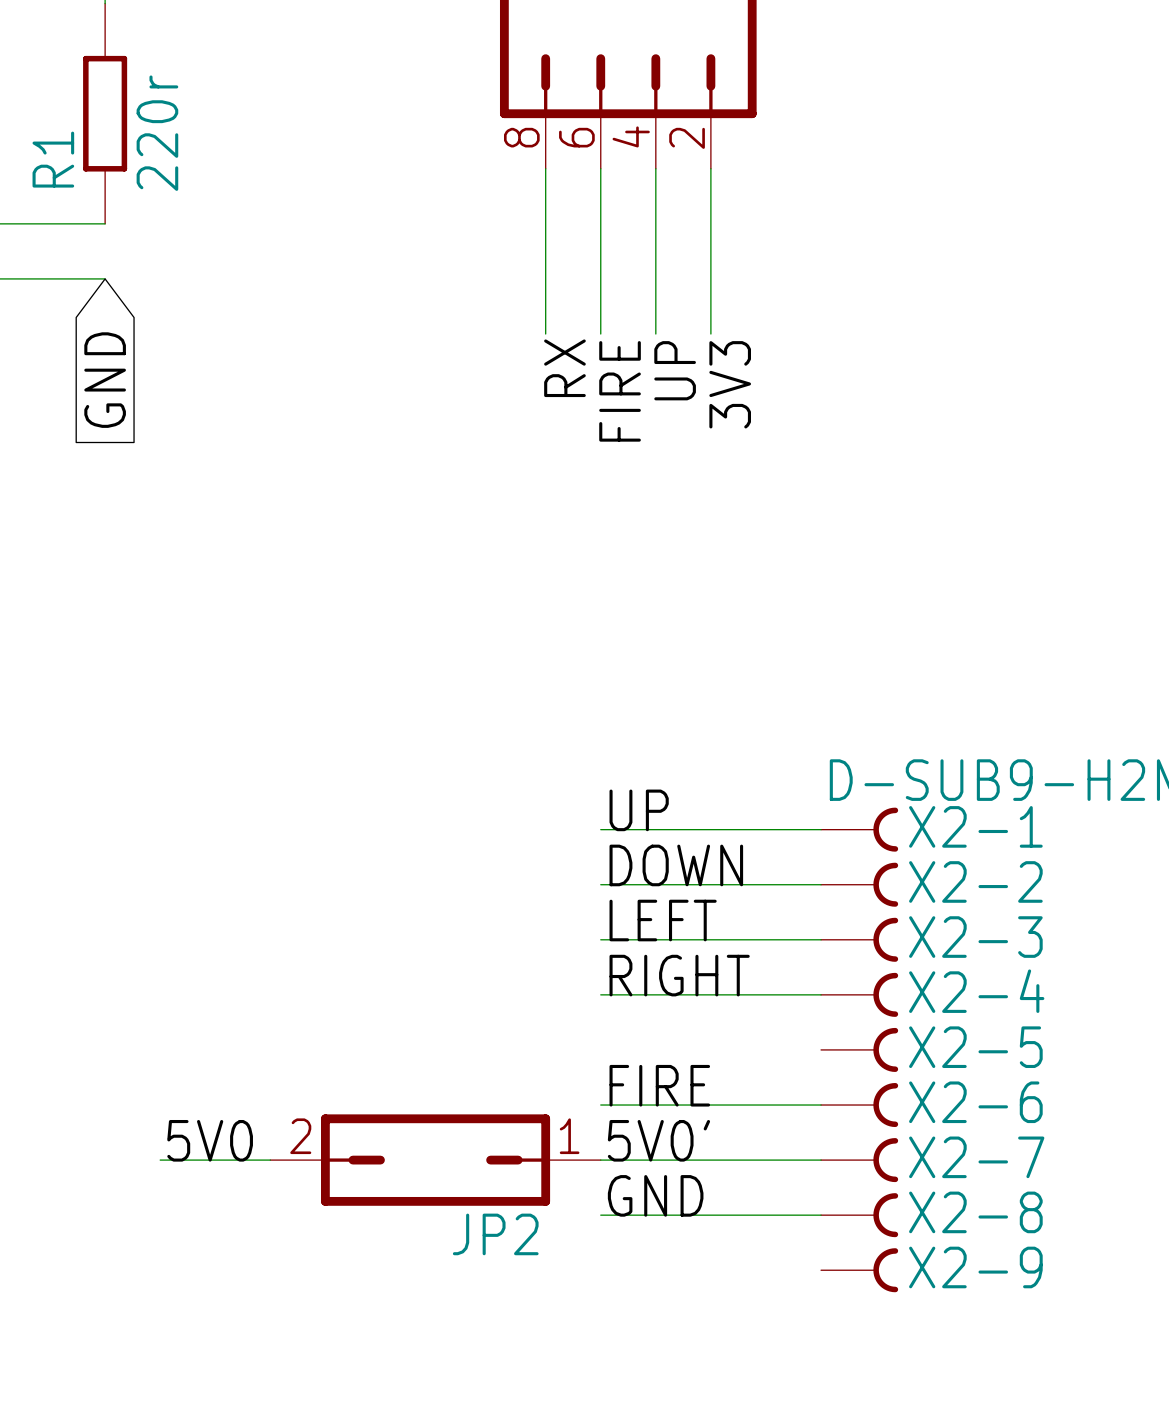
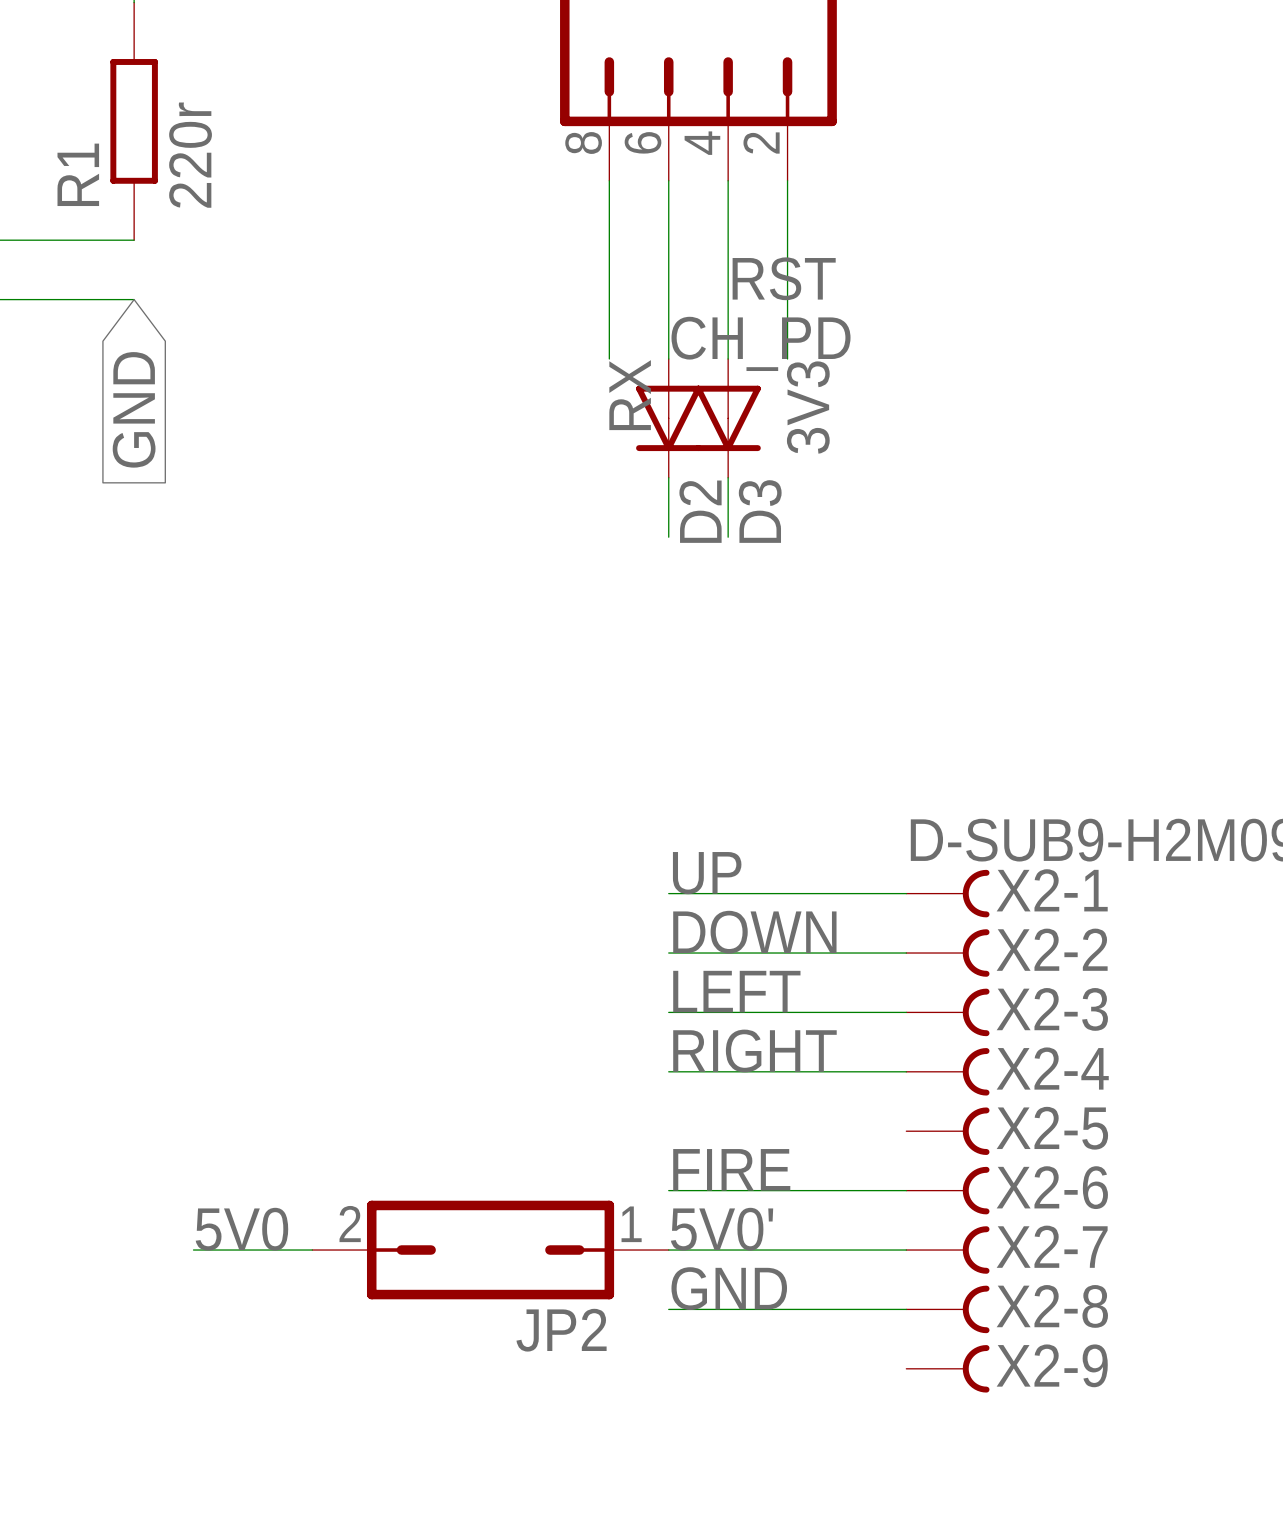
label: none -> RST (784, 278)
label: UP (675, 370) -> none
D2: none -> (668, 418)
D3: none -> (728, 418)
label: FIRE (620, 391) -> CH_PD (761, 343)
wire: none -> (668, 477) (668, 537)
wire: none -> (728, 477) (728, 537)

